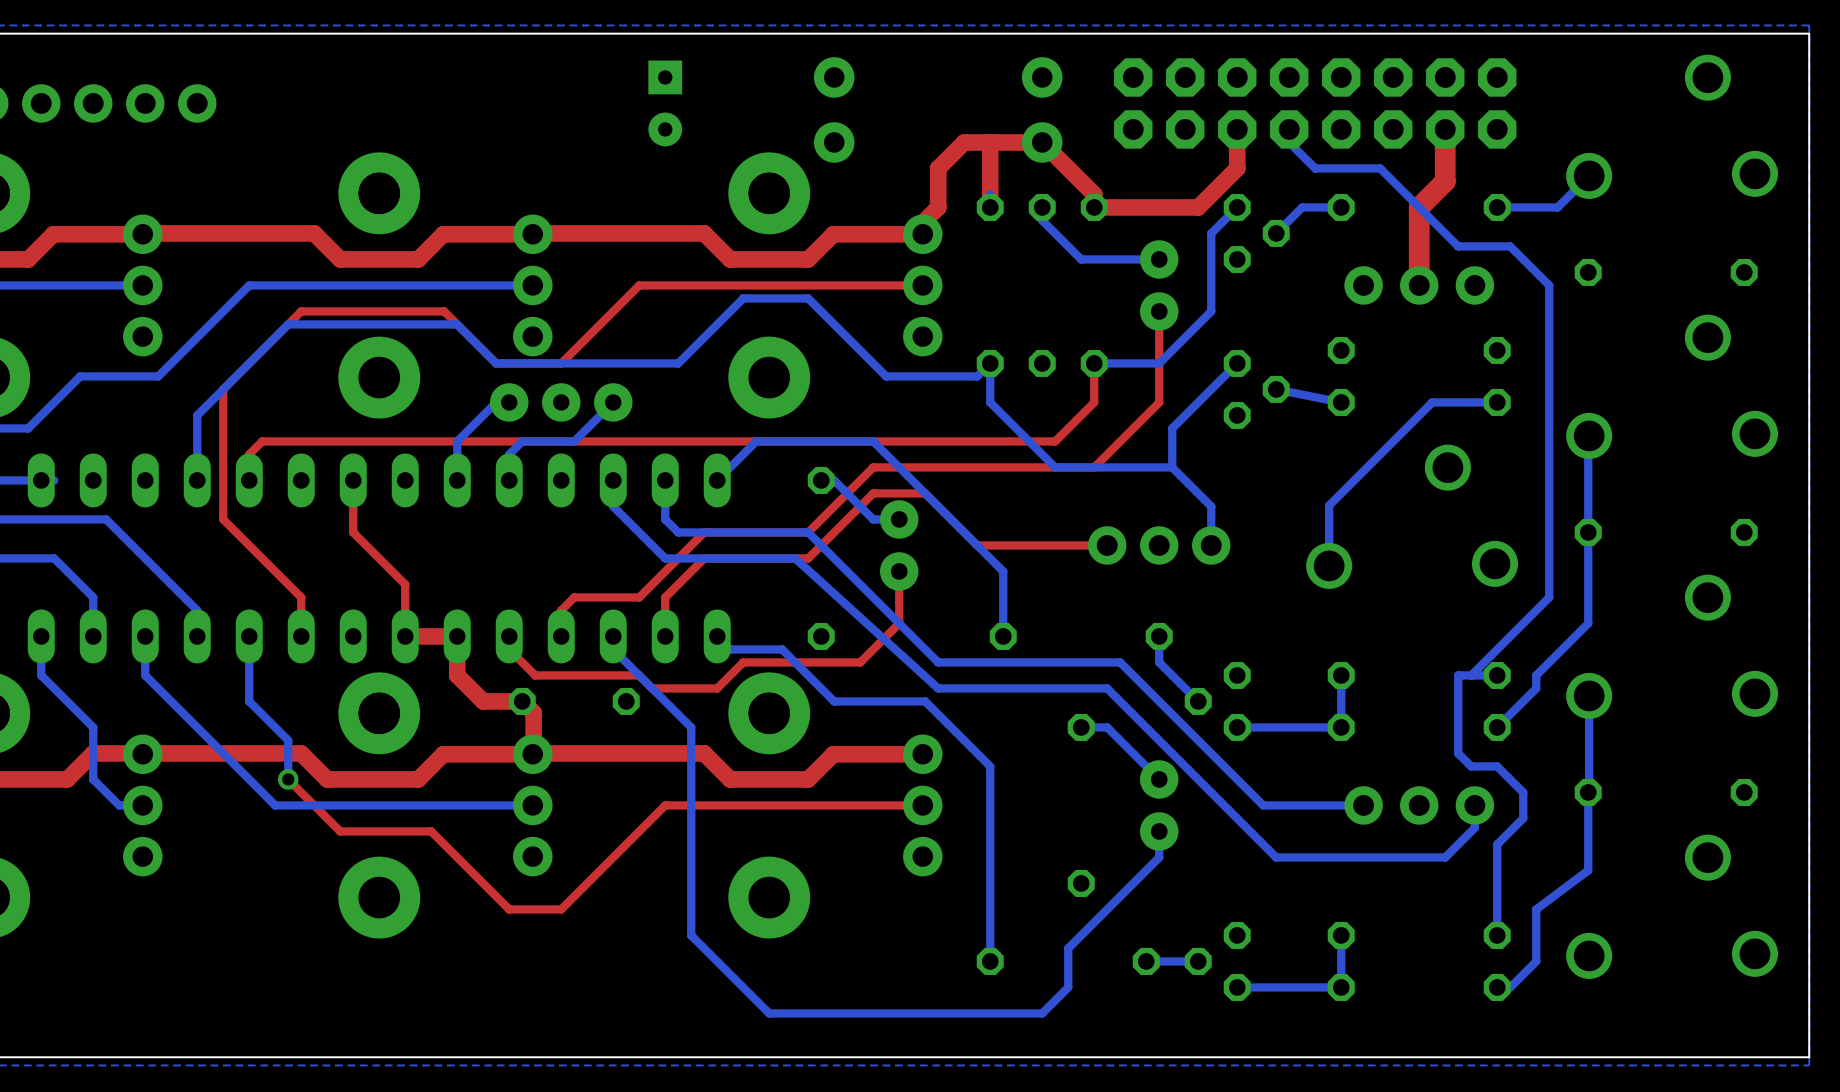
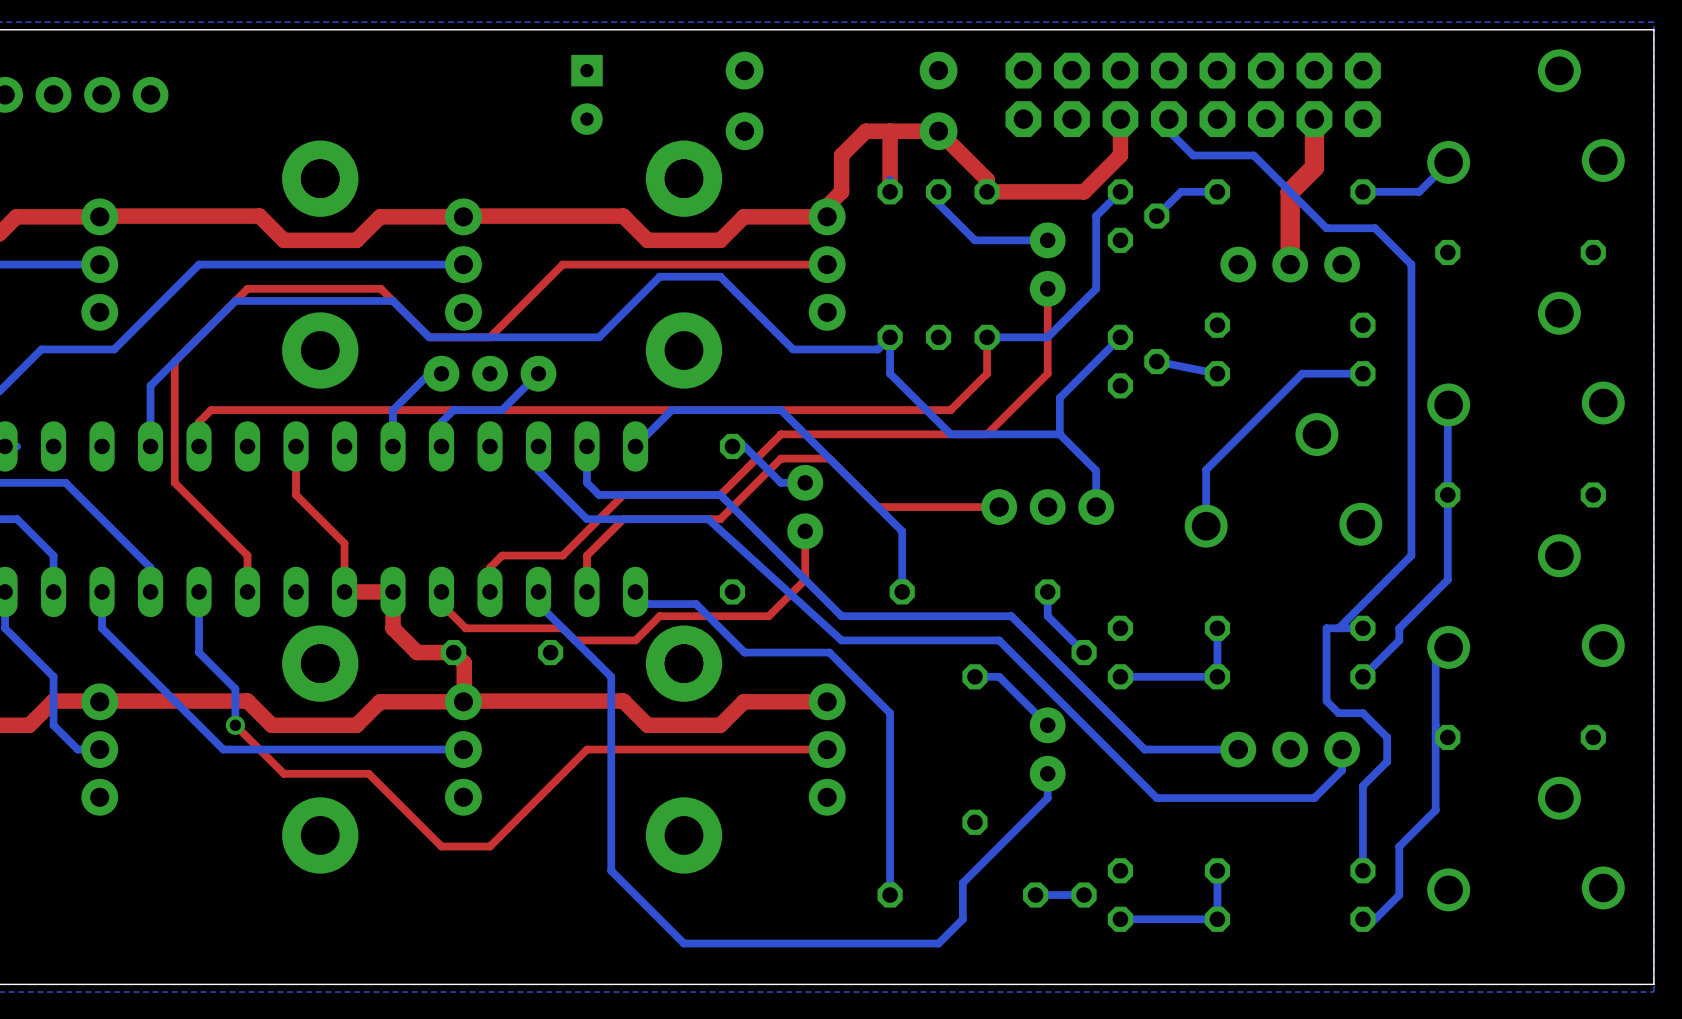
bottom track: (1589, 695) (1588, 870) (1536, 909) -> (1448, 647) (1435, 660) (1435, 810) (1399, 846)

